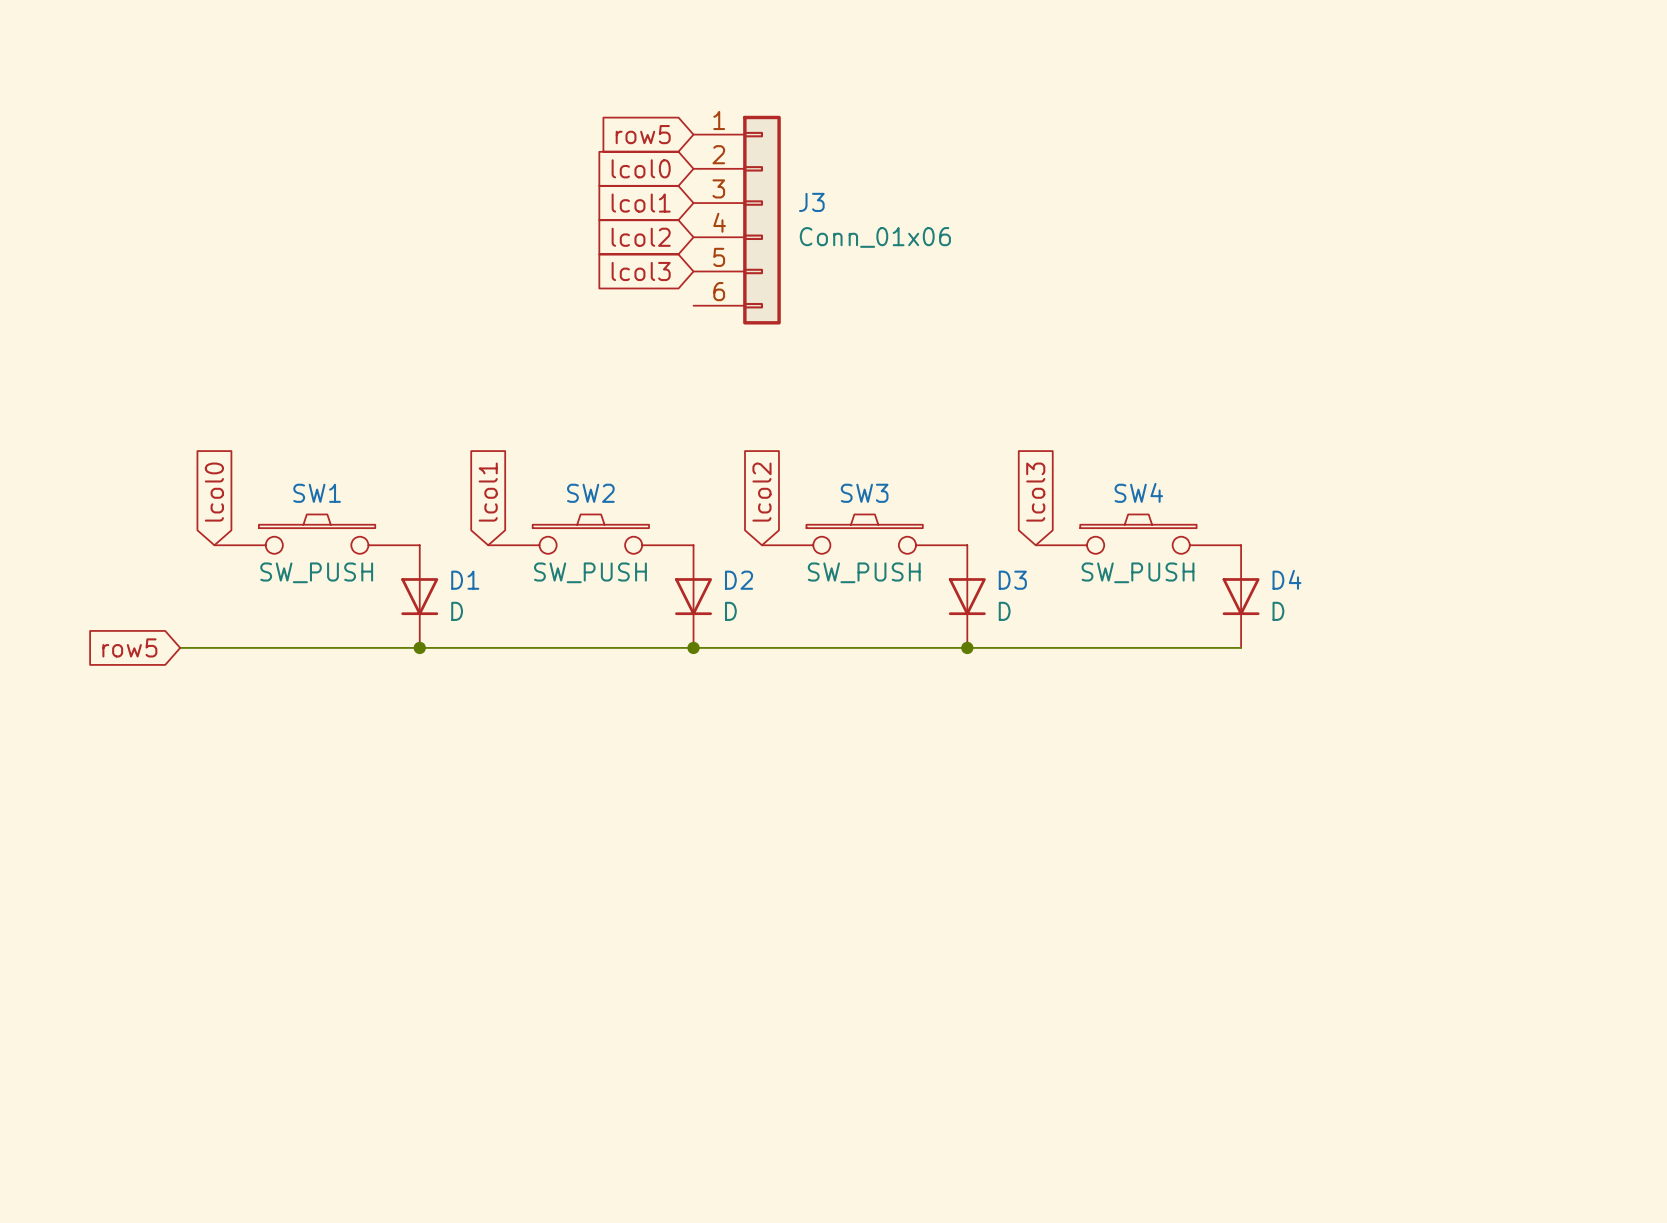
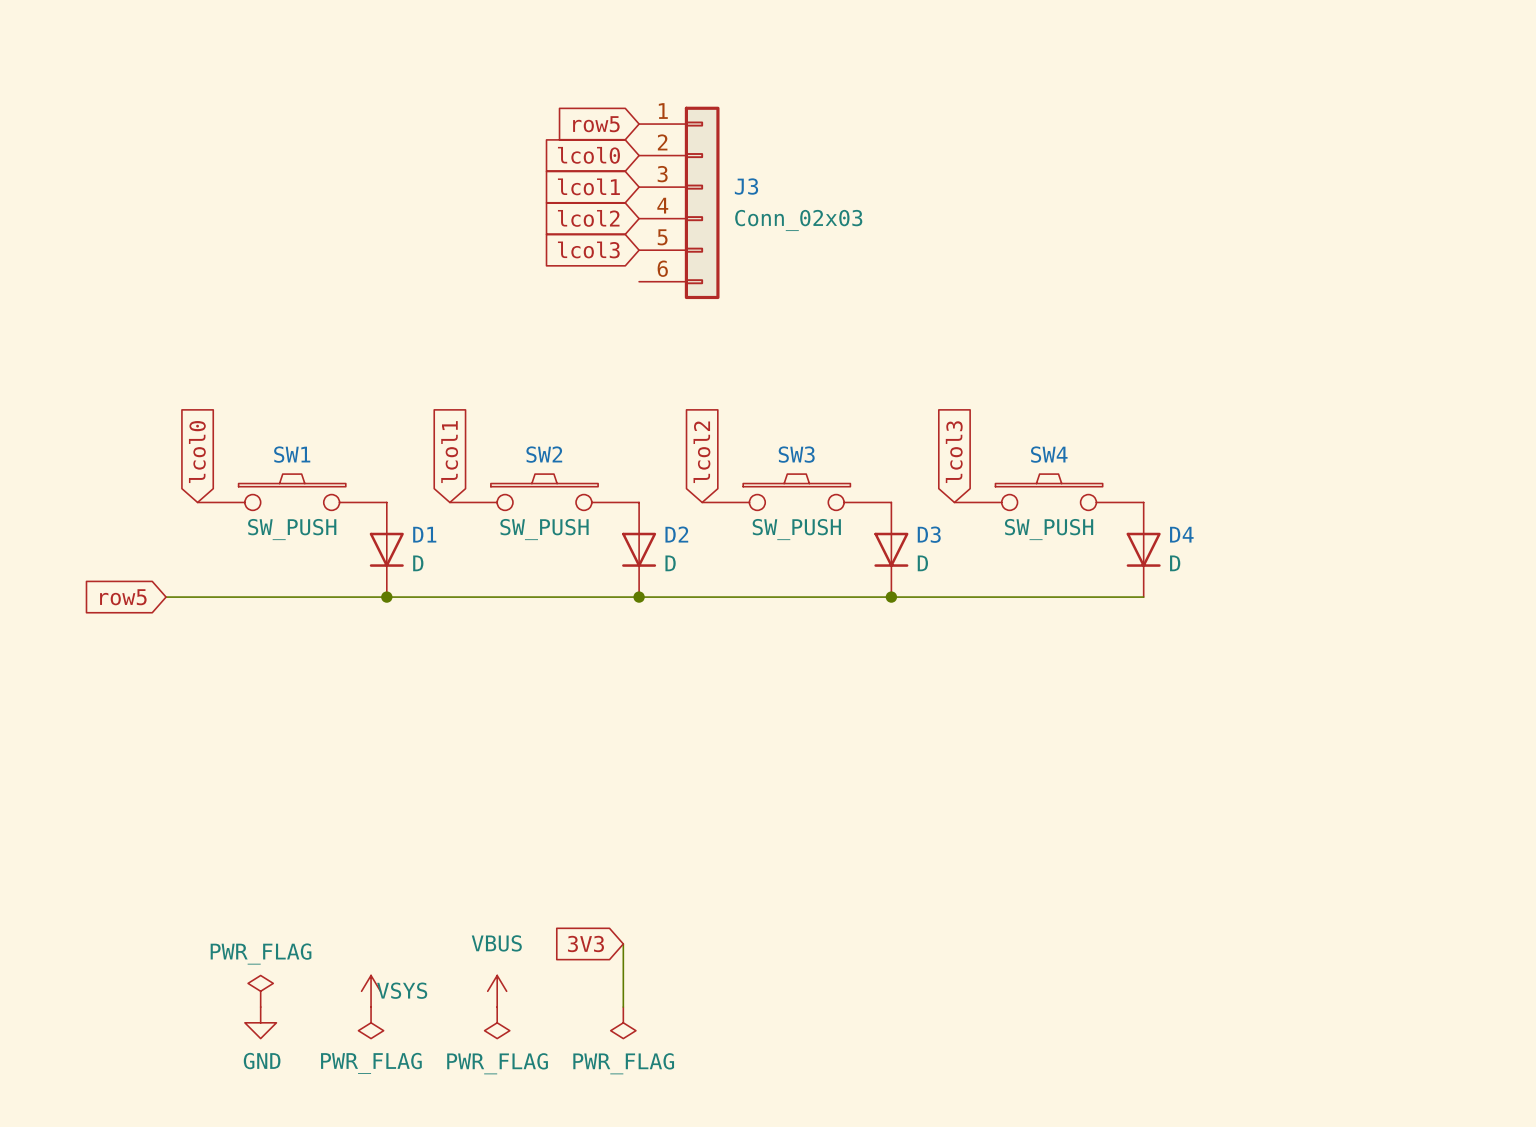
J3 value: Conn_01x06 (875, 237) -> Conn_02x03 (798, 220)
global label: none -> 3V3 (585, 943)
wire: none -> (623, 943) (623, 1007)
power symbol: none -> PWR_FLAG (260, 991)
power symbol: none -> VSYS (371, 991)
power symbol: none -> VBUS (497, 991)
power symbol: none -> GND (260, 1022)
power symbol: none -> PWR_FLAG (371, 1022)
power symbol: none -> PWR_FLAG (497, 1022)
power symbol: none -> PWR_FLAG (623, 1022)

